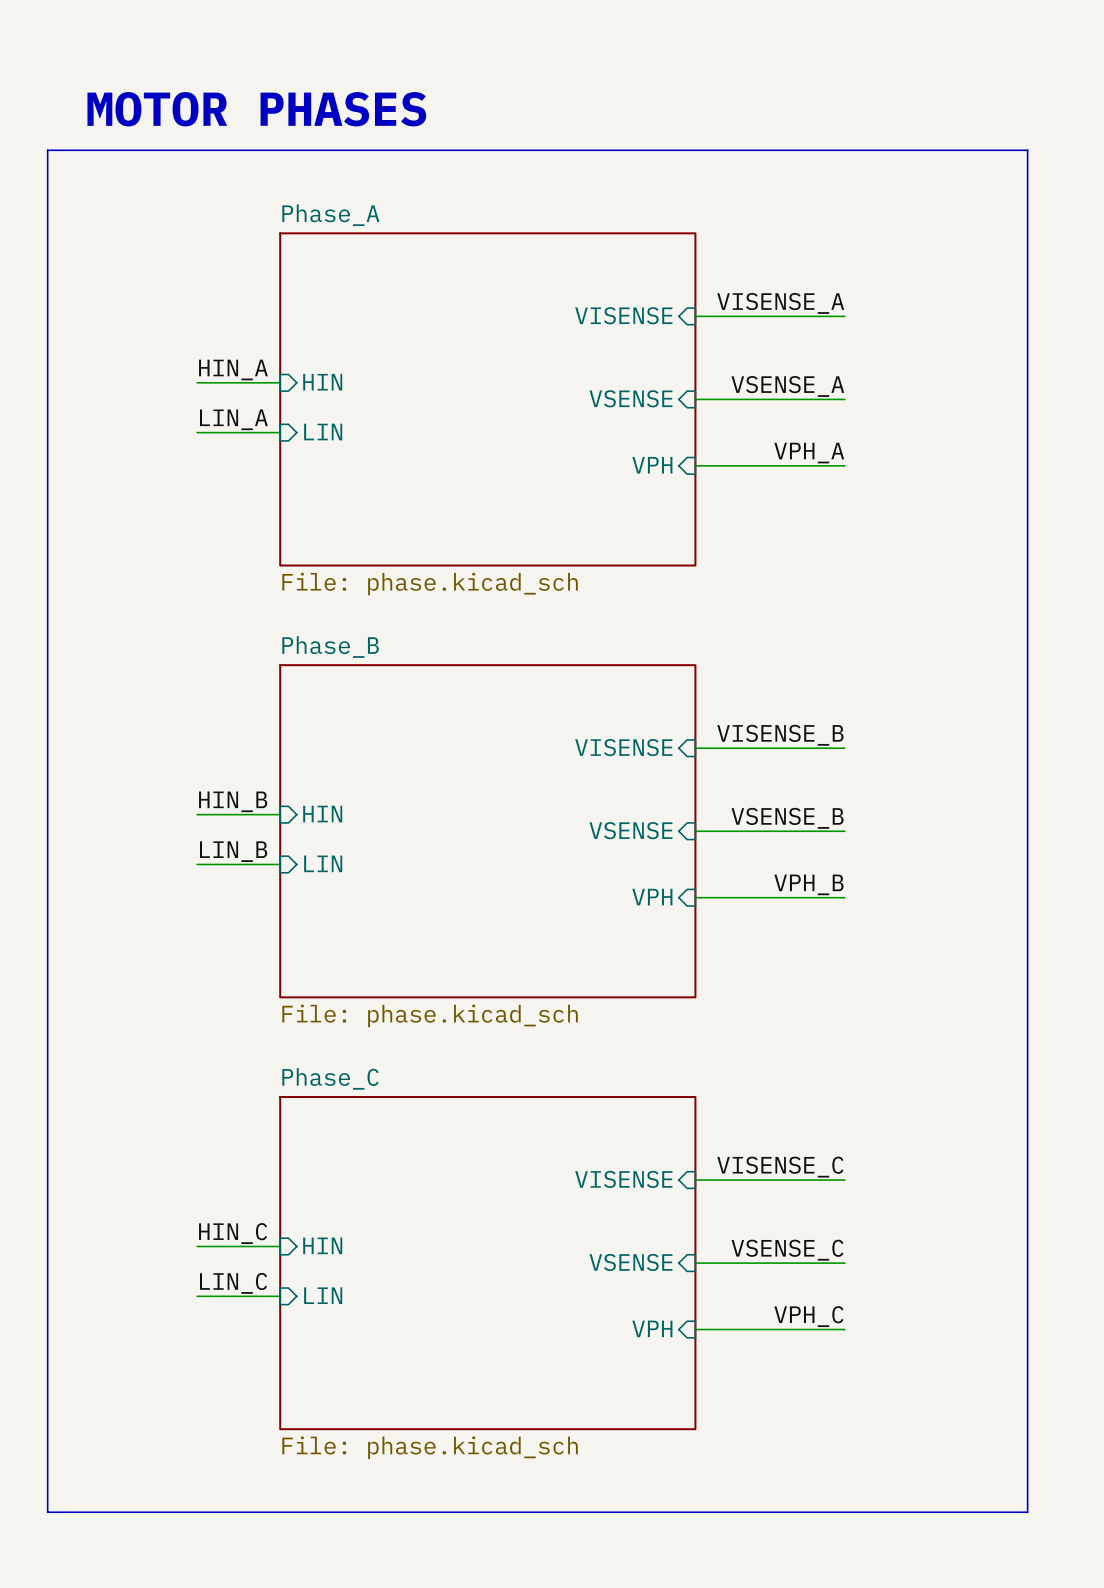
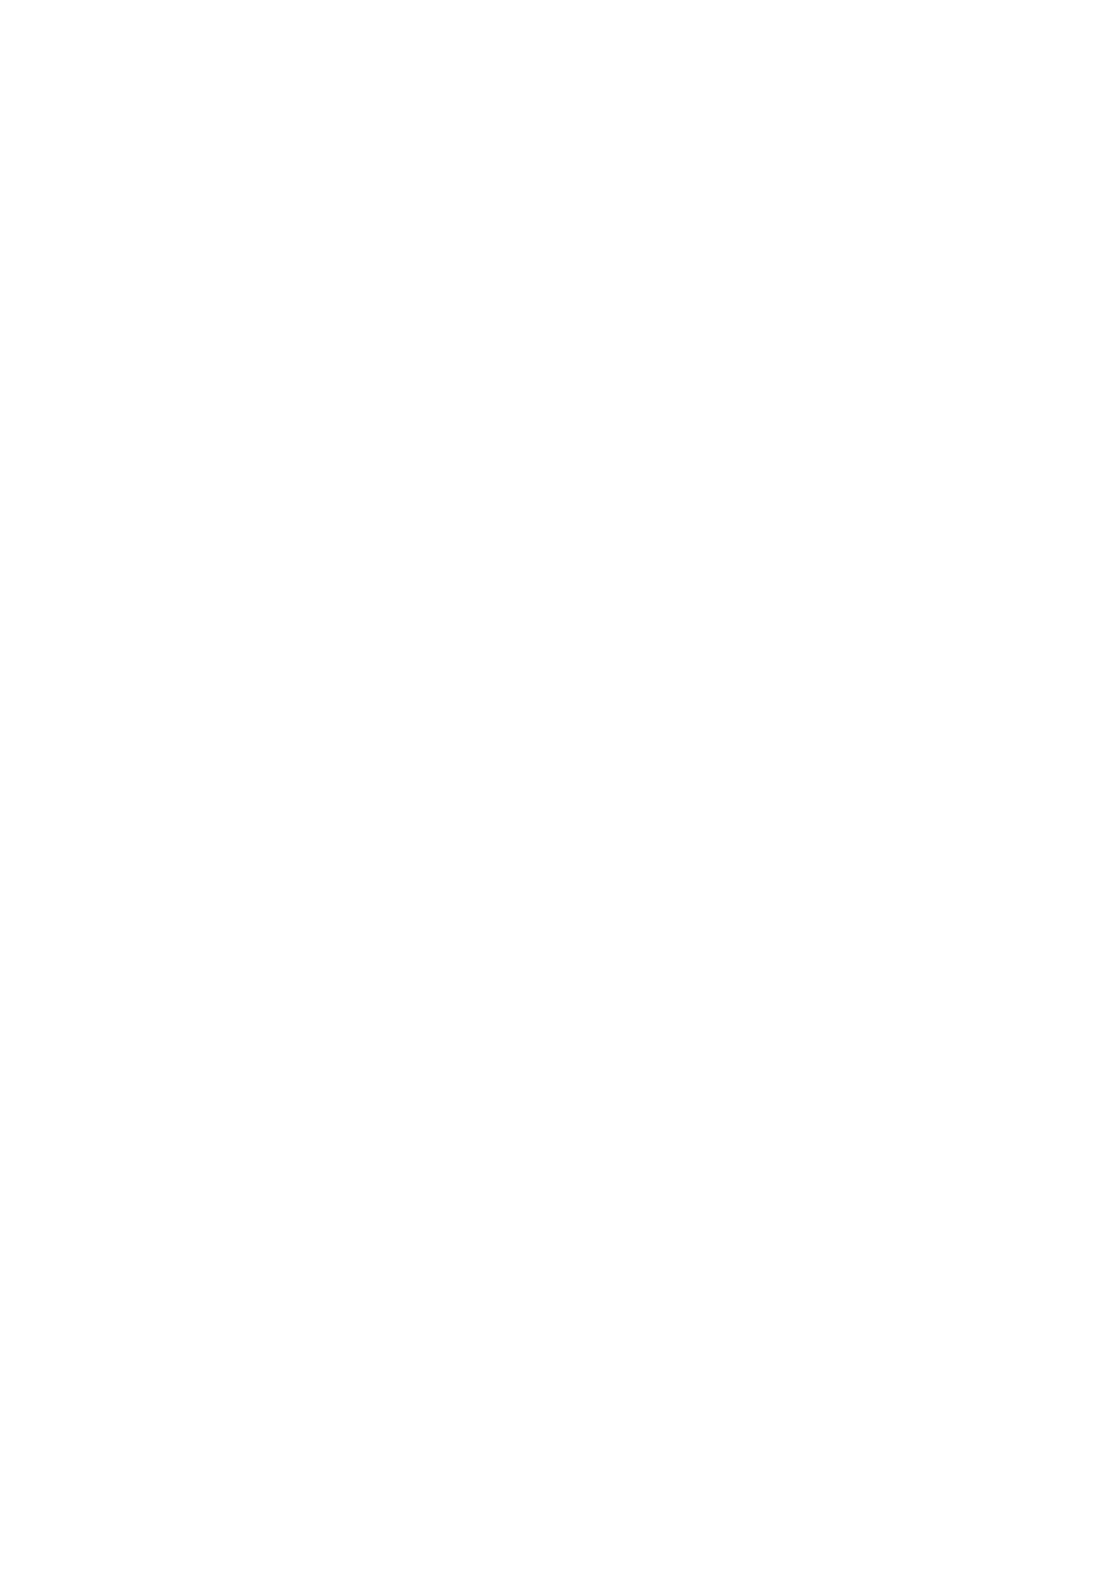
text: MOTOR PHASES (256, 109) -> none
line: (47, 150) (1027, 150) (1027, 1512) (47, 1512) (47, 150) -> none
label: VISENSE_A (780, 303) -> none
sheet pin: VISENSE (623, 315) -> none
wire: (695, 316) (844, 316) -> none
label: HIN_A (233, 370) -> none
wire: (197, 382) (280, 382) -> none
sheet pin: HIN (322, 382) -> none
label: VSENSE_A (787, 386) -> none
sheet pin: VSENSE (630, 398) -> none
sheet Phase_A: File: phase.kicad_sch (487, 399) -> none
wire: (695, 399) (844, 399) -> none
label: LIN_A (233, 419) -> none
wire: (197, 432) (280, 432) -> none
sheet pin: LIN (323, 432) -> none
label: VPH_A (809, 453) -> none
sheet pin: VPH (652, 465) -> none
wire: (695, 465) (844, 465) -> none
label: VISENSE_B (780, 735) -> none
sheet pin: VISENSE (623, 747) -> none
wire: (695, 748) (844, 748) -> none
label: HIN_B (233, 801) -> none
wire: (197, 814) (280, 814) -> none
sheet pin: HIN (322, 814) -> none
label: VSENSE_B (787, 818) -> none
sheet pin: VSENSE (630, 830) -> none
sheet Phase_B: File: phase.kicad_sch (487, 831) -> none
wire: (695, 831) (844, 831) -> none
label: LIN_B (233, 851) -> none
sheet pin: LIN (323, 863) -> none
wire: (197, 864) (280, 864) -> none
label: VPH_B (808, 884) -> none
sheet pin: VPH (652, 897) -> none
wire: (695, 897) (844, 897) -> none
label: VISENSE_C (780, 1167) -> none
sheet pin: VISENSE (623, 1179) -> none
wire: (695, 1180) (844, 1180) -> none
label: HIN_C (233, 1233) -> none
sheet pin: HIN (322, 1245) -> none
wire: (197, 1246) (280, 1246) -> none
label: VSENSE_C (787, 1250) -> none
sheet pin: VSENSE (630, 1262) -> none
sheet Phase_C: File: phase.kicad_sch (487, 1263) -> none
wire: (695, 1263) (844, 1263) -> none
label: LIN_C (233, 1283) -> none
sheet pin: LIN (323, 1295) -> none
wire: (197, 1296) (280, 1296) -> none
label: VPH_C (808, 1316) -> none
sheet pin: VPH (652, 1328) -> none
wire: (695, 1329) (844, 1329) -> none

